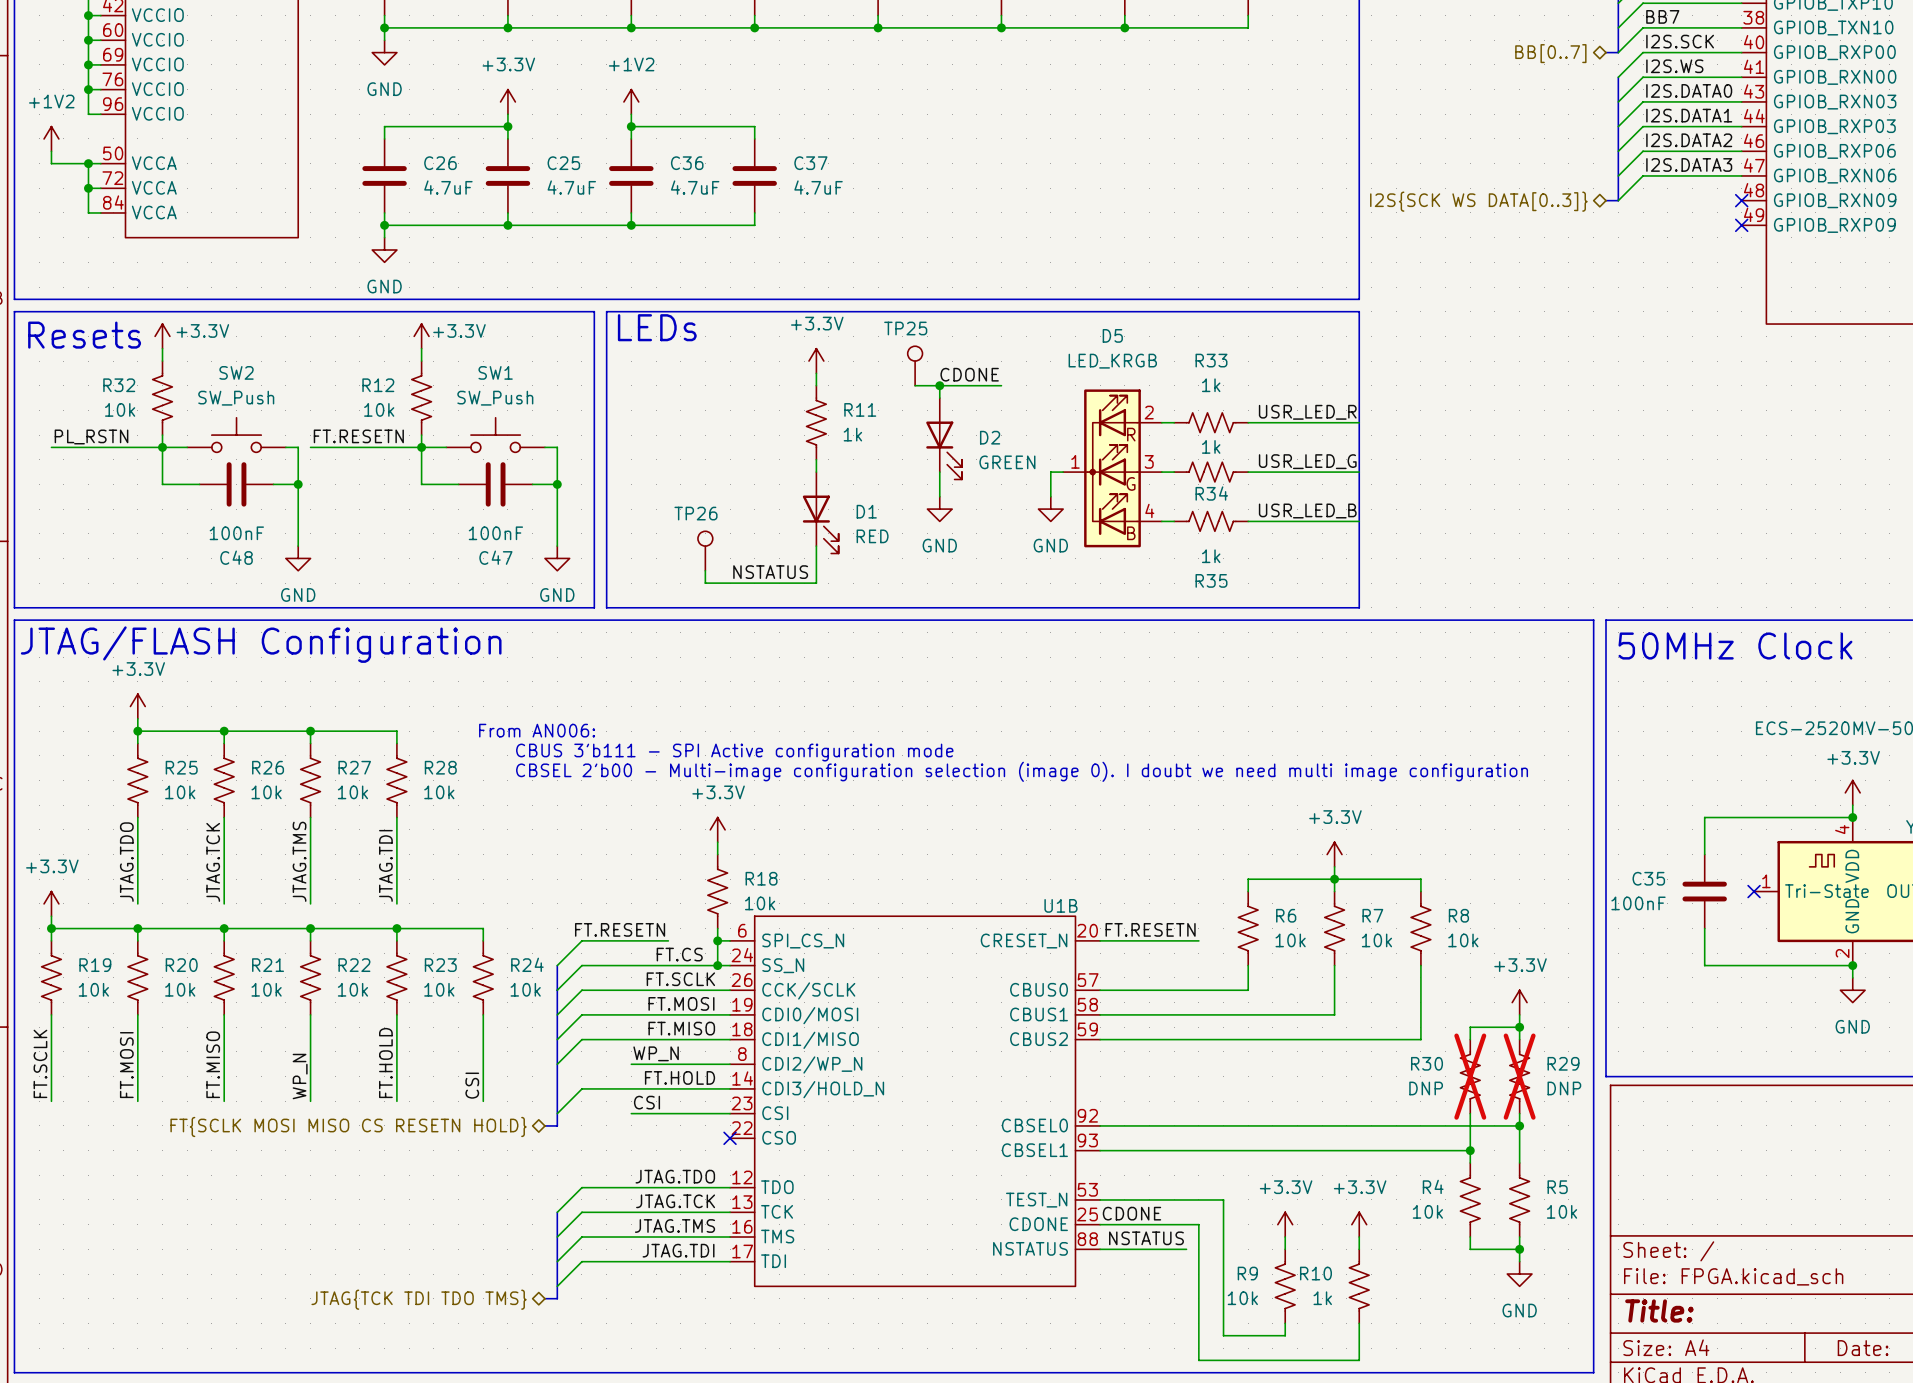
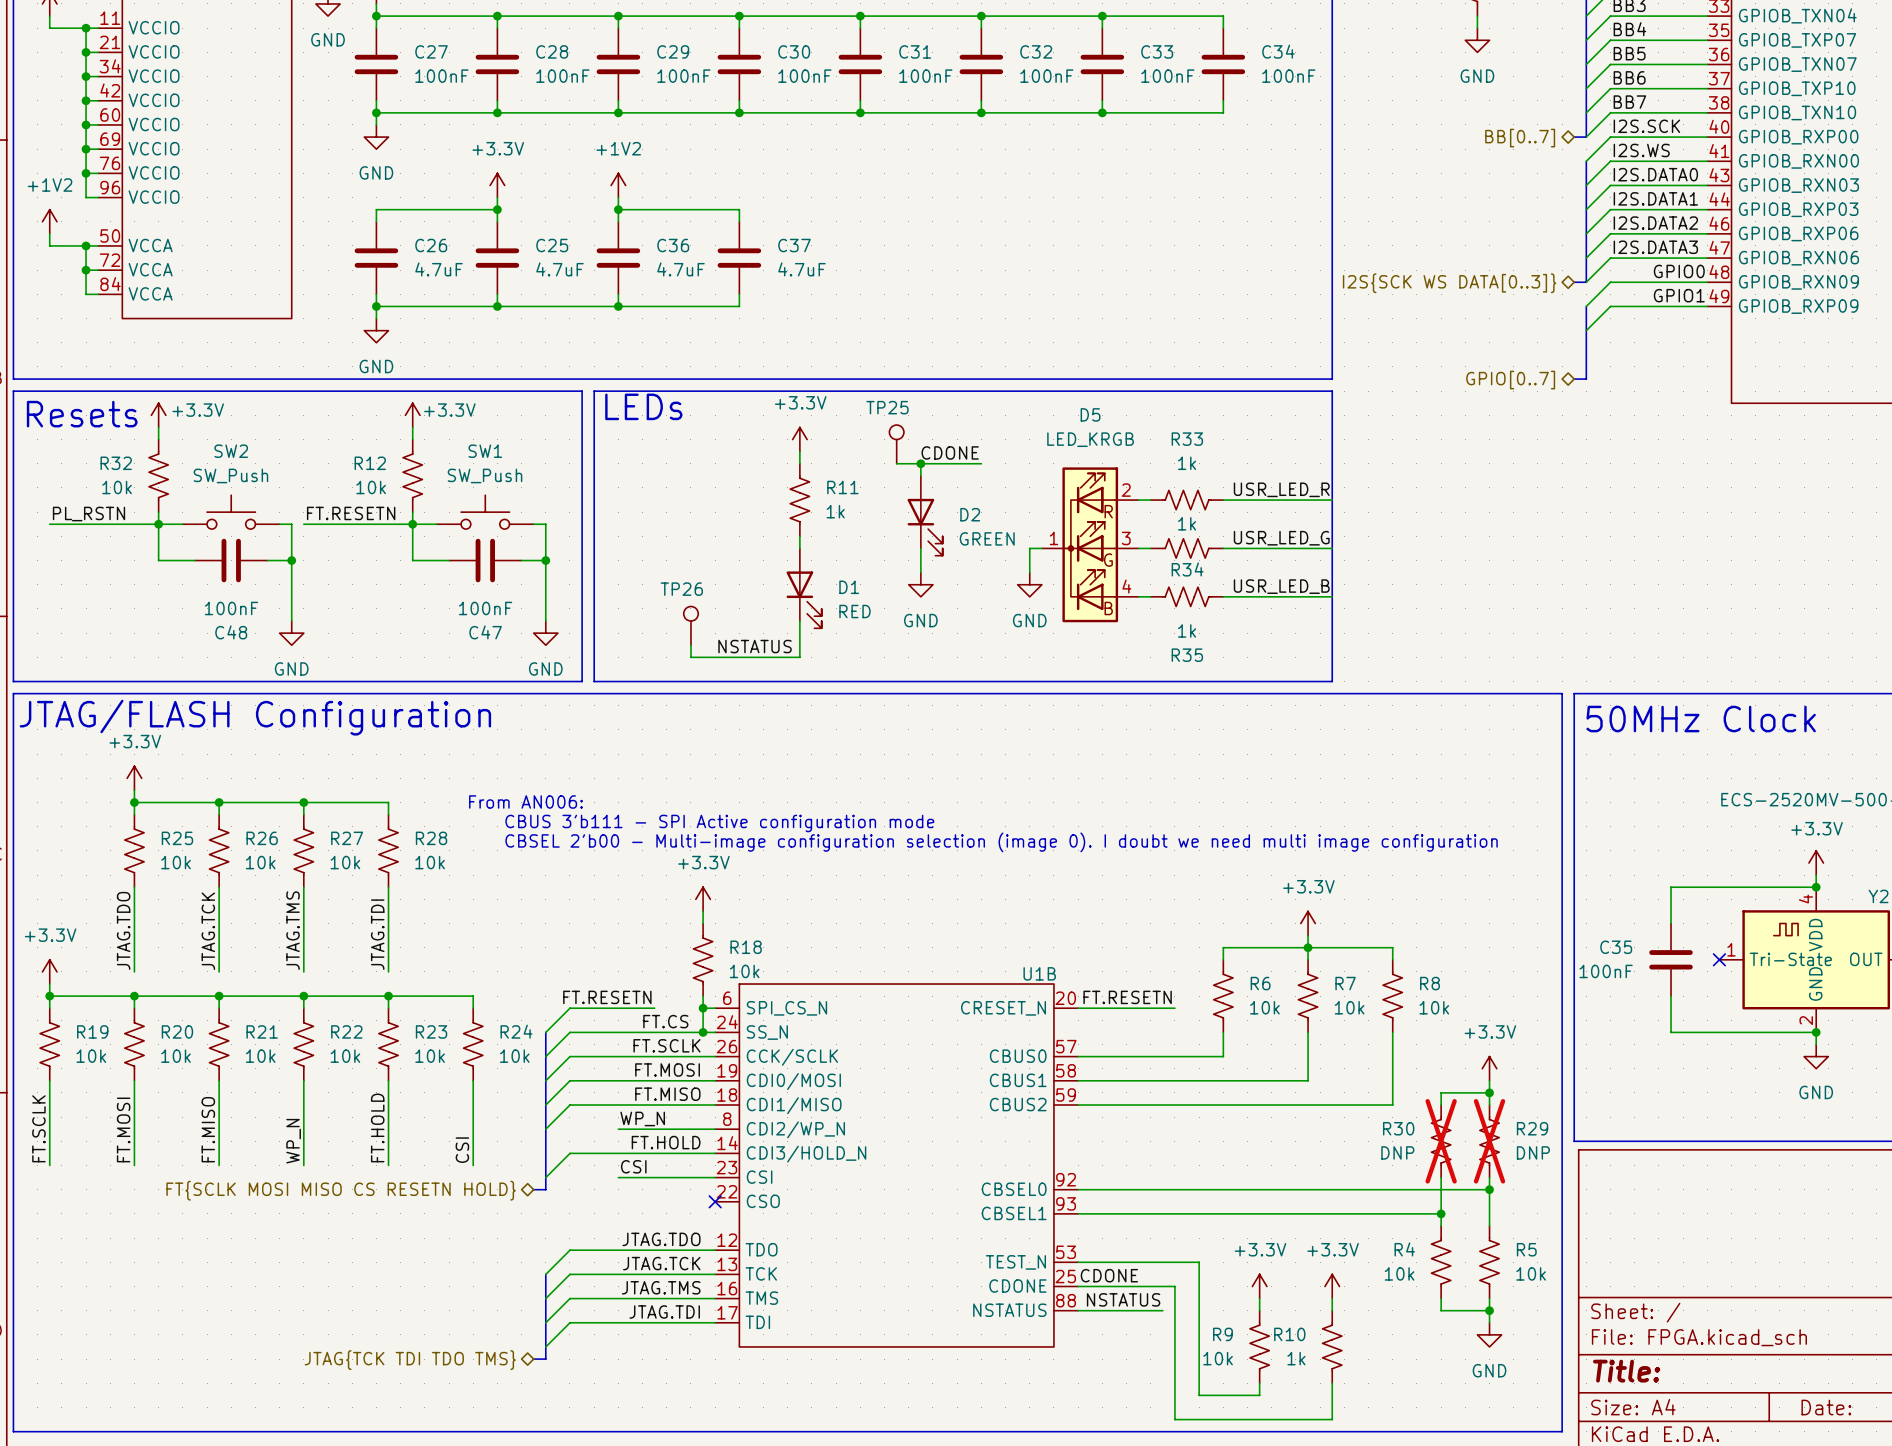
label: none -> GPIO0 (1679, 271)
wire: none -> (1707, 282) (1610, 282) (1586, 306)
no-connect mark: (1741, 200) -> none
label: none -> GPIO1 (1679, 295)
bus: none -> (1586, 306) (1586, 379) (1574, 379)
wire: none -> (1707, 306) (1610, 306) (1586, 330)
no-connect mark: (1741, 225) -> none
hierarchical label: none -> GPIO[0..7] (1510, 380)

